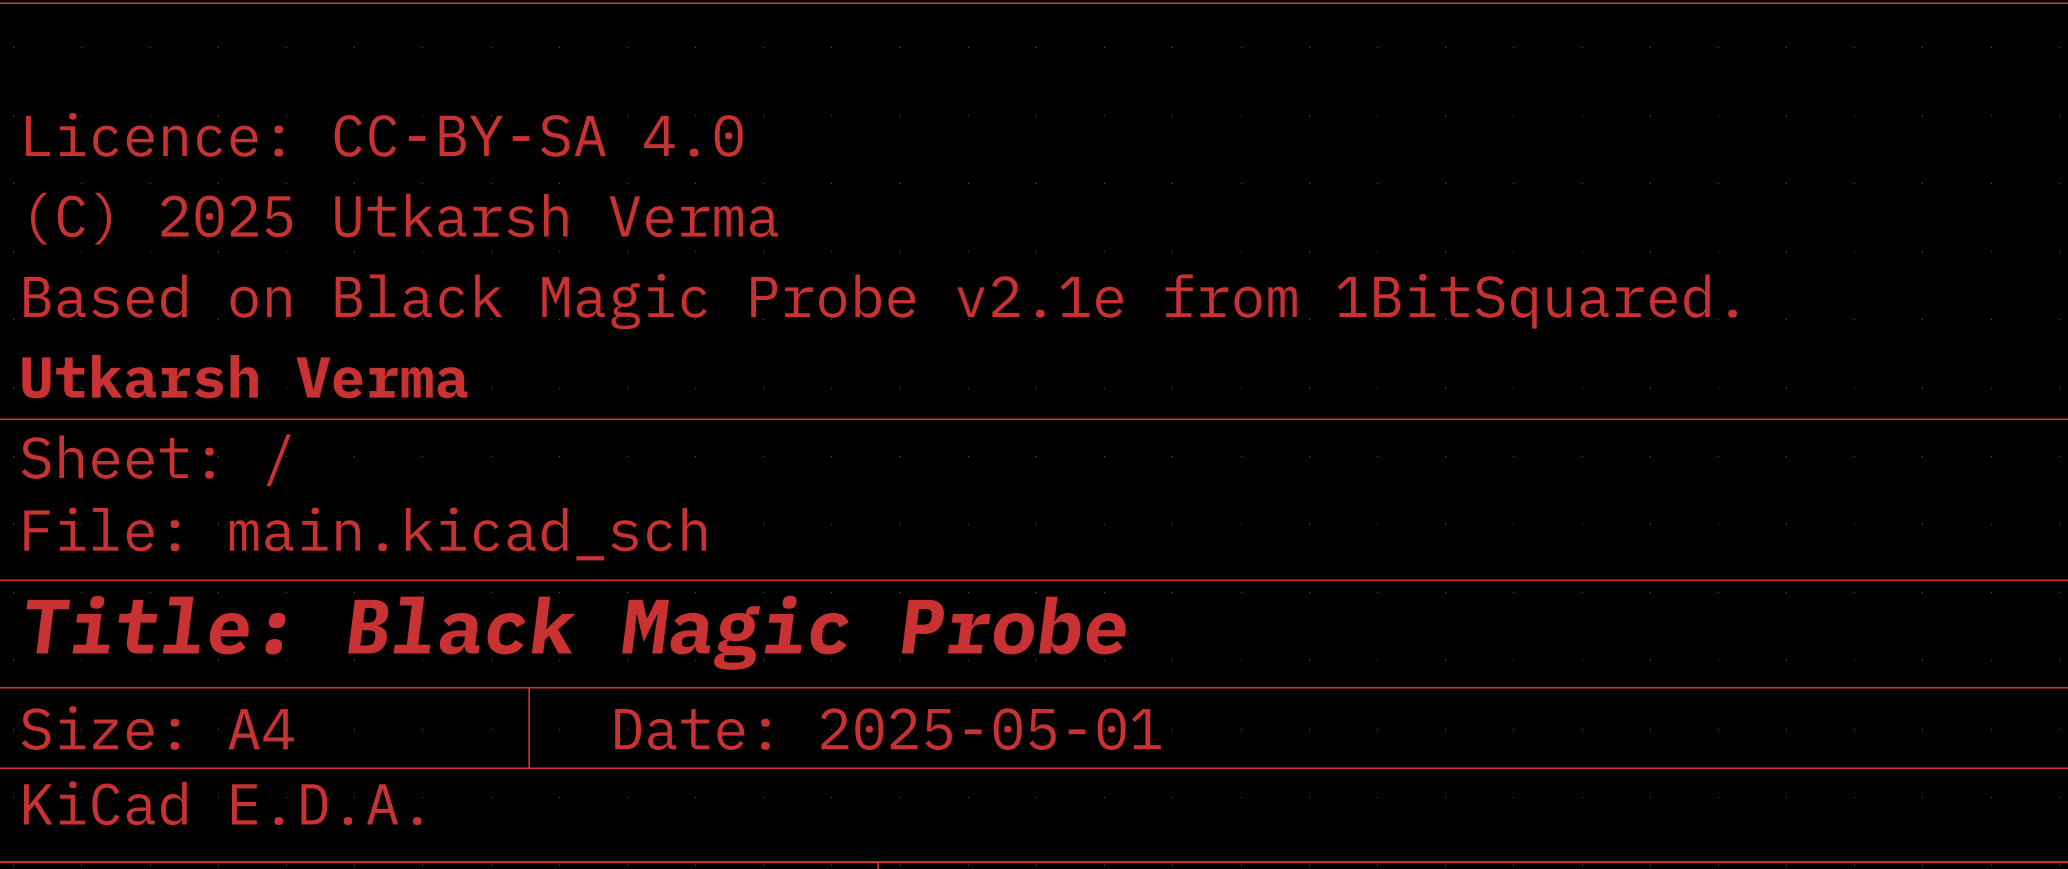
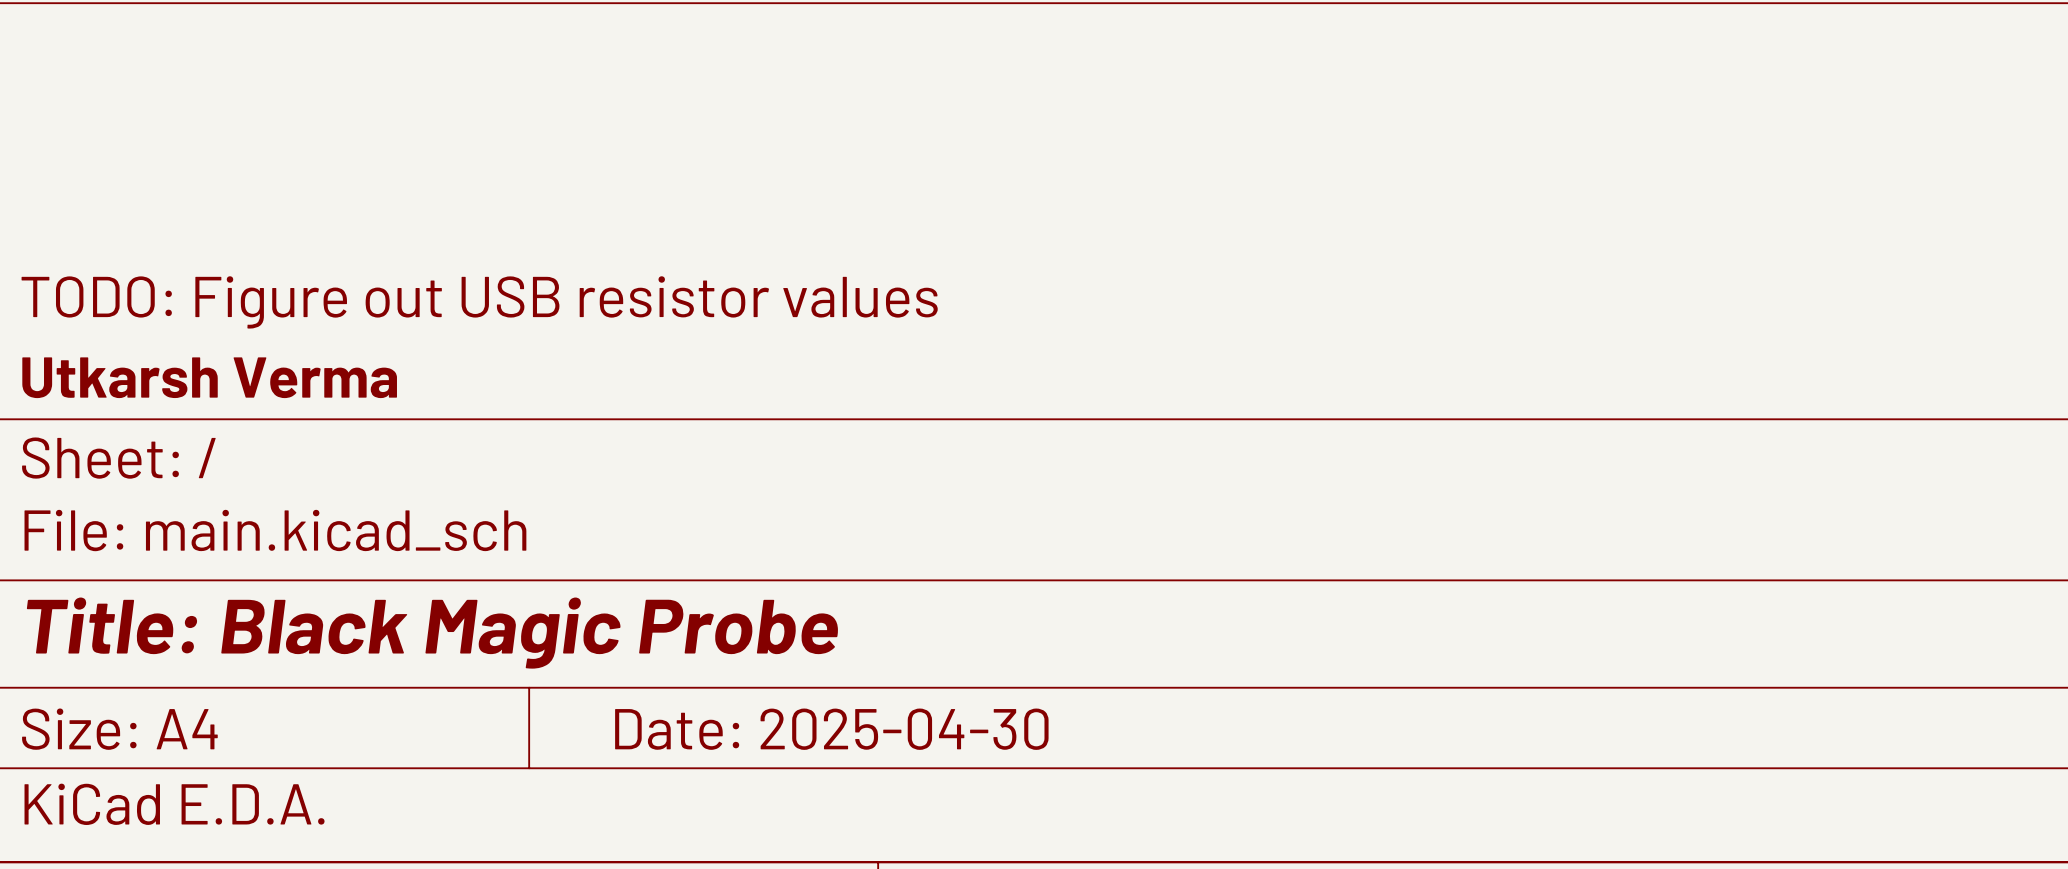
title block: Licence: CC-BY-SA 4.0 (384, 134) -> none
title block: (C) 2025 Utkarsh Verma (404, 218) -> none
title block: Based on Black Magic Probe v2.1e from 1BitSquared. (880, 301) -> TODO: Figure out USB resistor values (479, 302)
title block: Date: 2025-05-01 (888, 729) -> Date: 2025-04-30 (831, 729)

